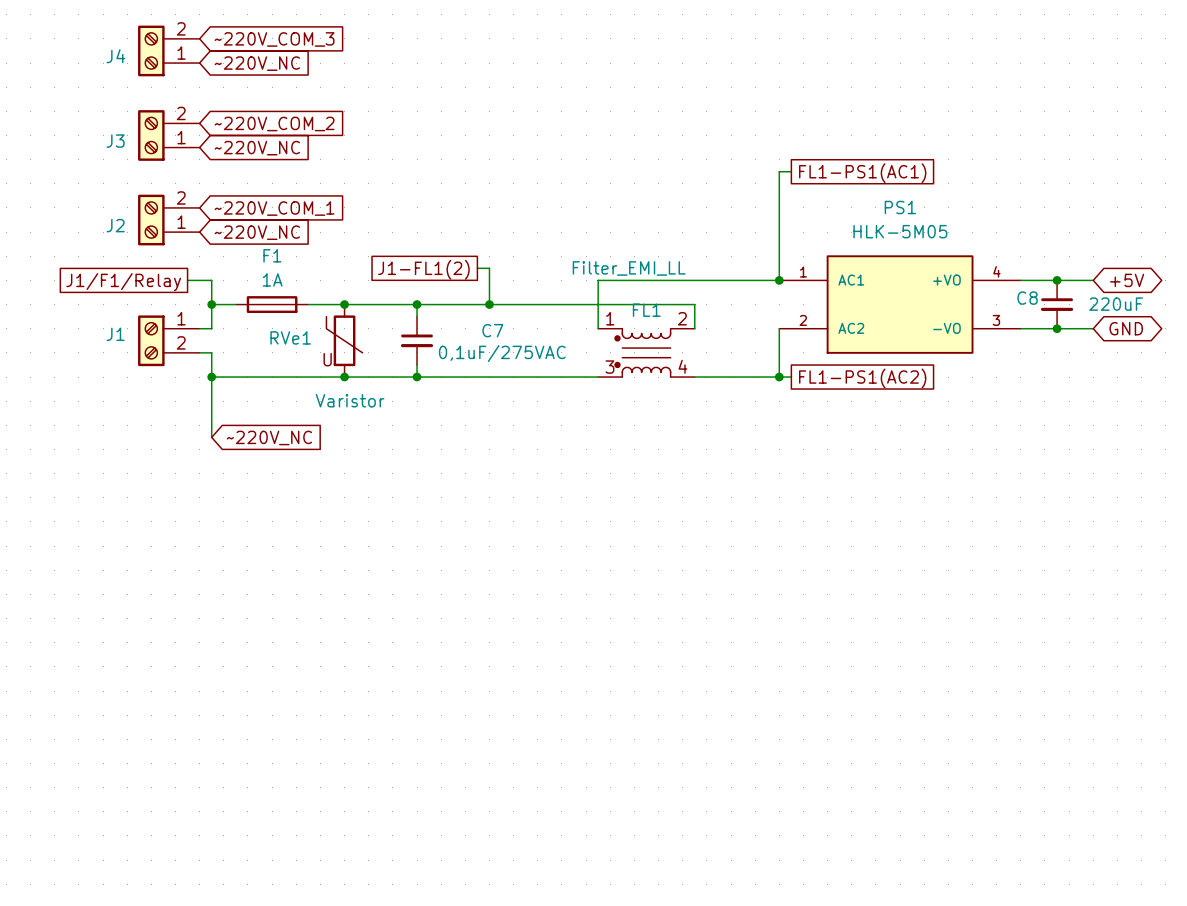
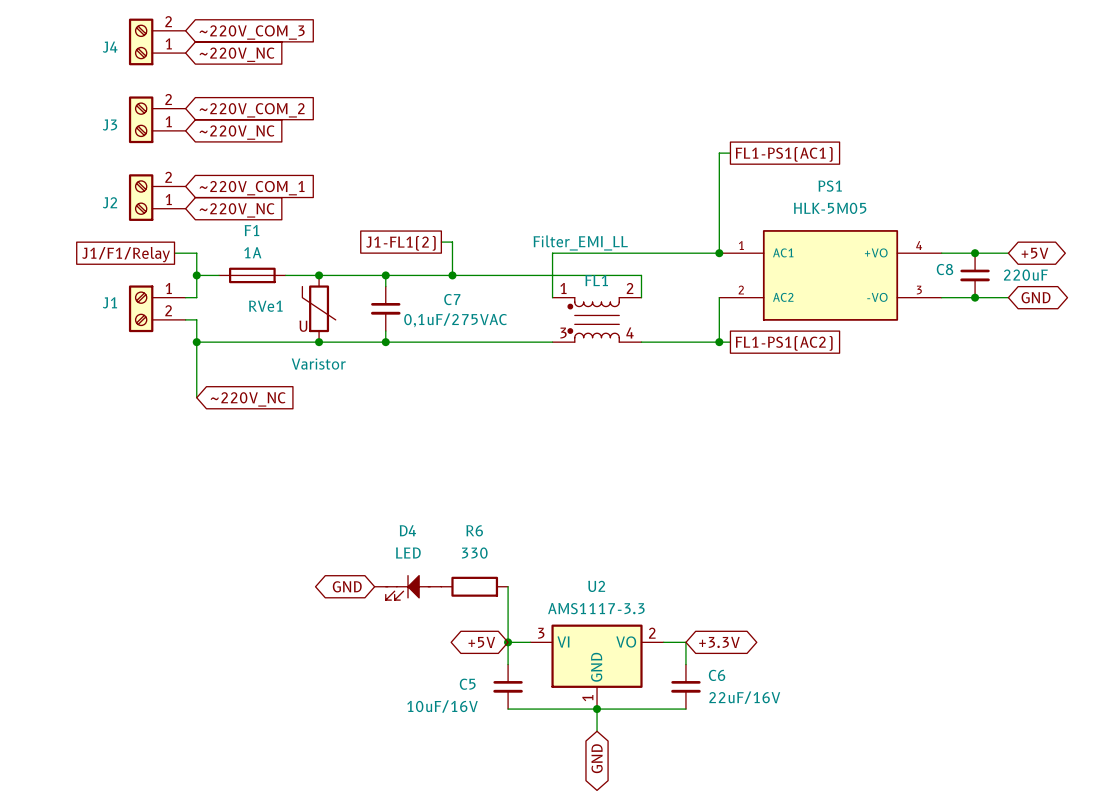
global label: none -> GND (347, 586)
R6: none -> 330 (474, 586)
wire: none -> (508, 586) (508, 664)
D4: none -> LED (408, 587)
global label: none -> +5V (481, 642)
wire: none -> (508, 642) (530, 642)
junction: none -> (508, 642)
wire: none -> (663, 642) (685, 642) (685, 664)
global label: none -> +3.3V (719, 642)
U2: none -> AMS1117-3.3 (597, 666)
C5: none -> (508, 686)
C6: none -> (685, 686)
wire: none -> (508, 709) (685, 709)
wire: none -> (597, 709) (597, 731)
junction: none -> (597, 709)
global label: none -> GND (597, 758)

